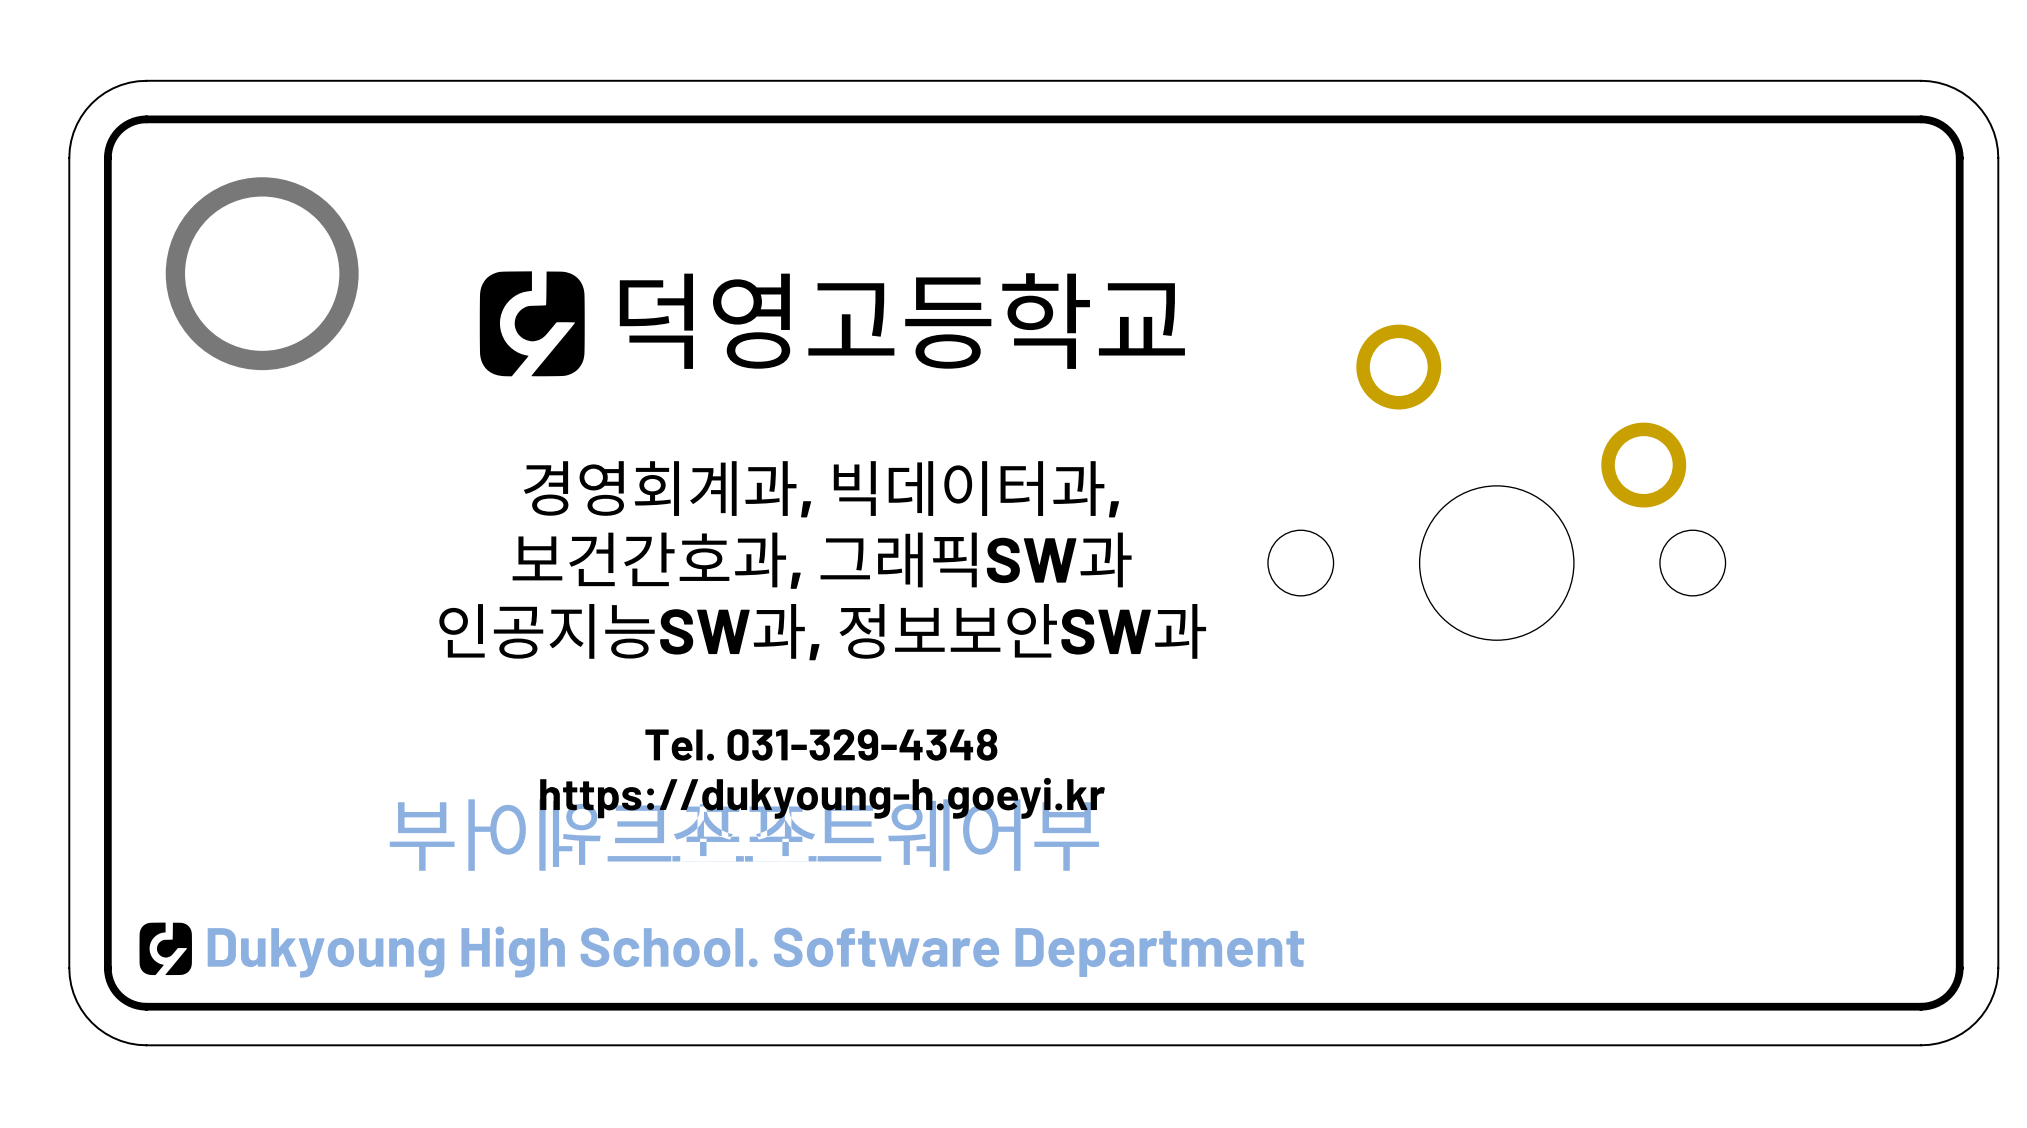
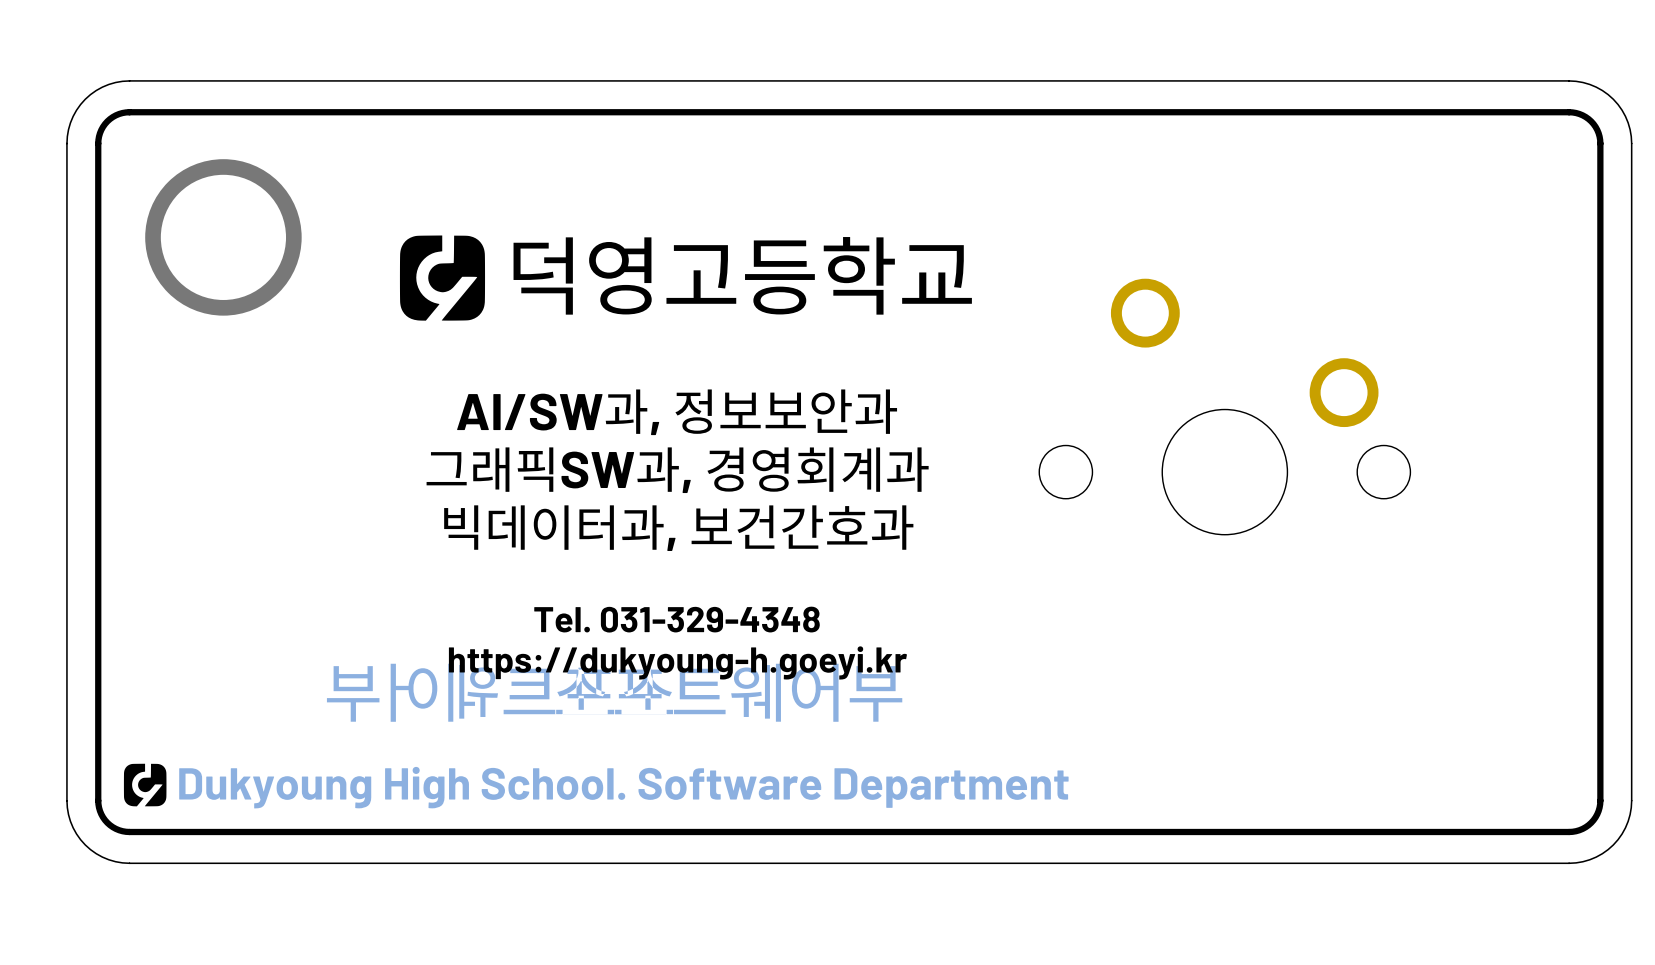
text: 경영회계과, 빅데이터과, (821, 489) -> AI/SW과, 정보보안과 (677, 412)
text: 보건간호과, 그래픽SW과 (822, 560) -> 그래픽SW과, 경영회계과 (677, 470)
text: 인공지능SW과, 정보보안SW과 (822, 632) -> 빅데이터과, 보건간호과 (678, 528)

